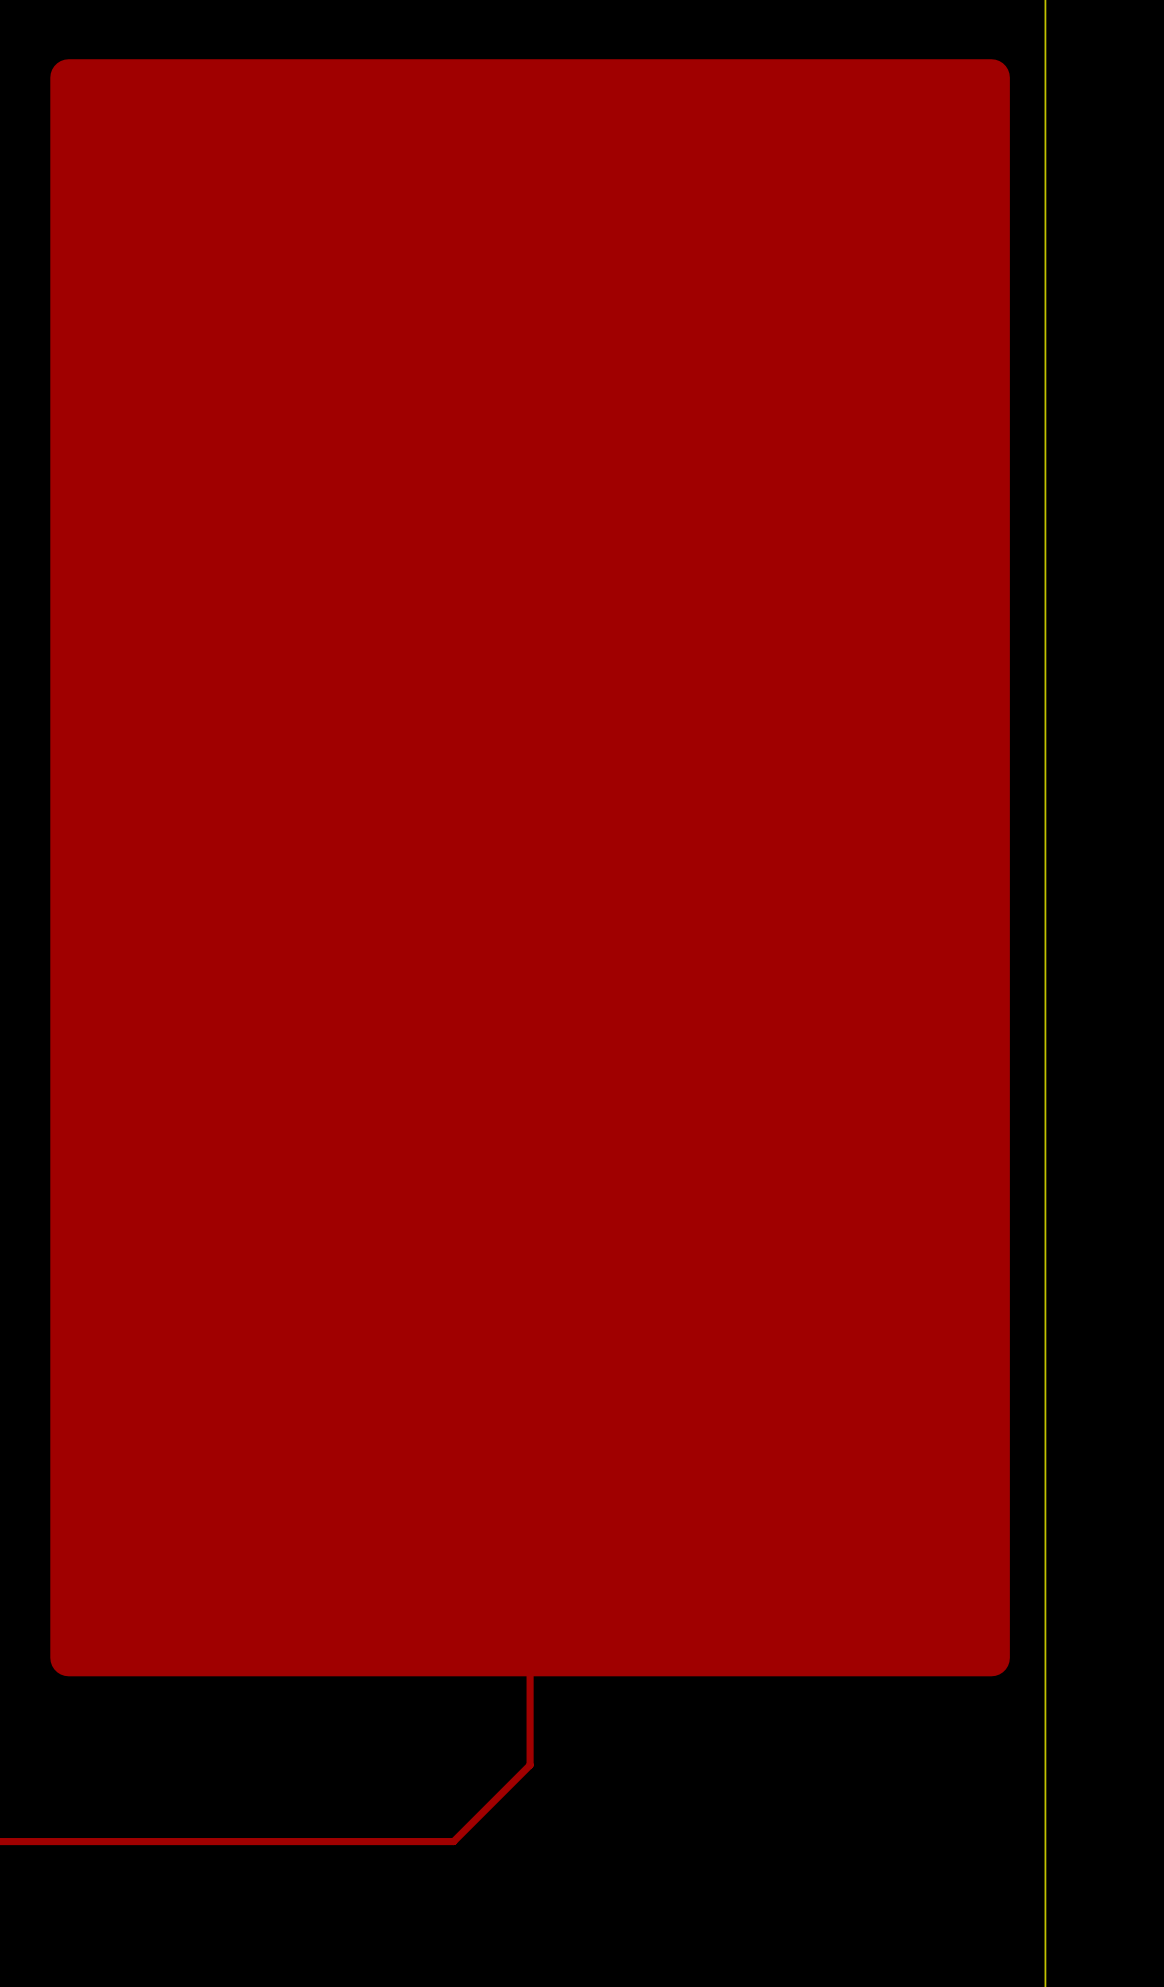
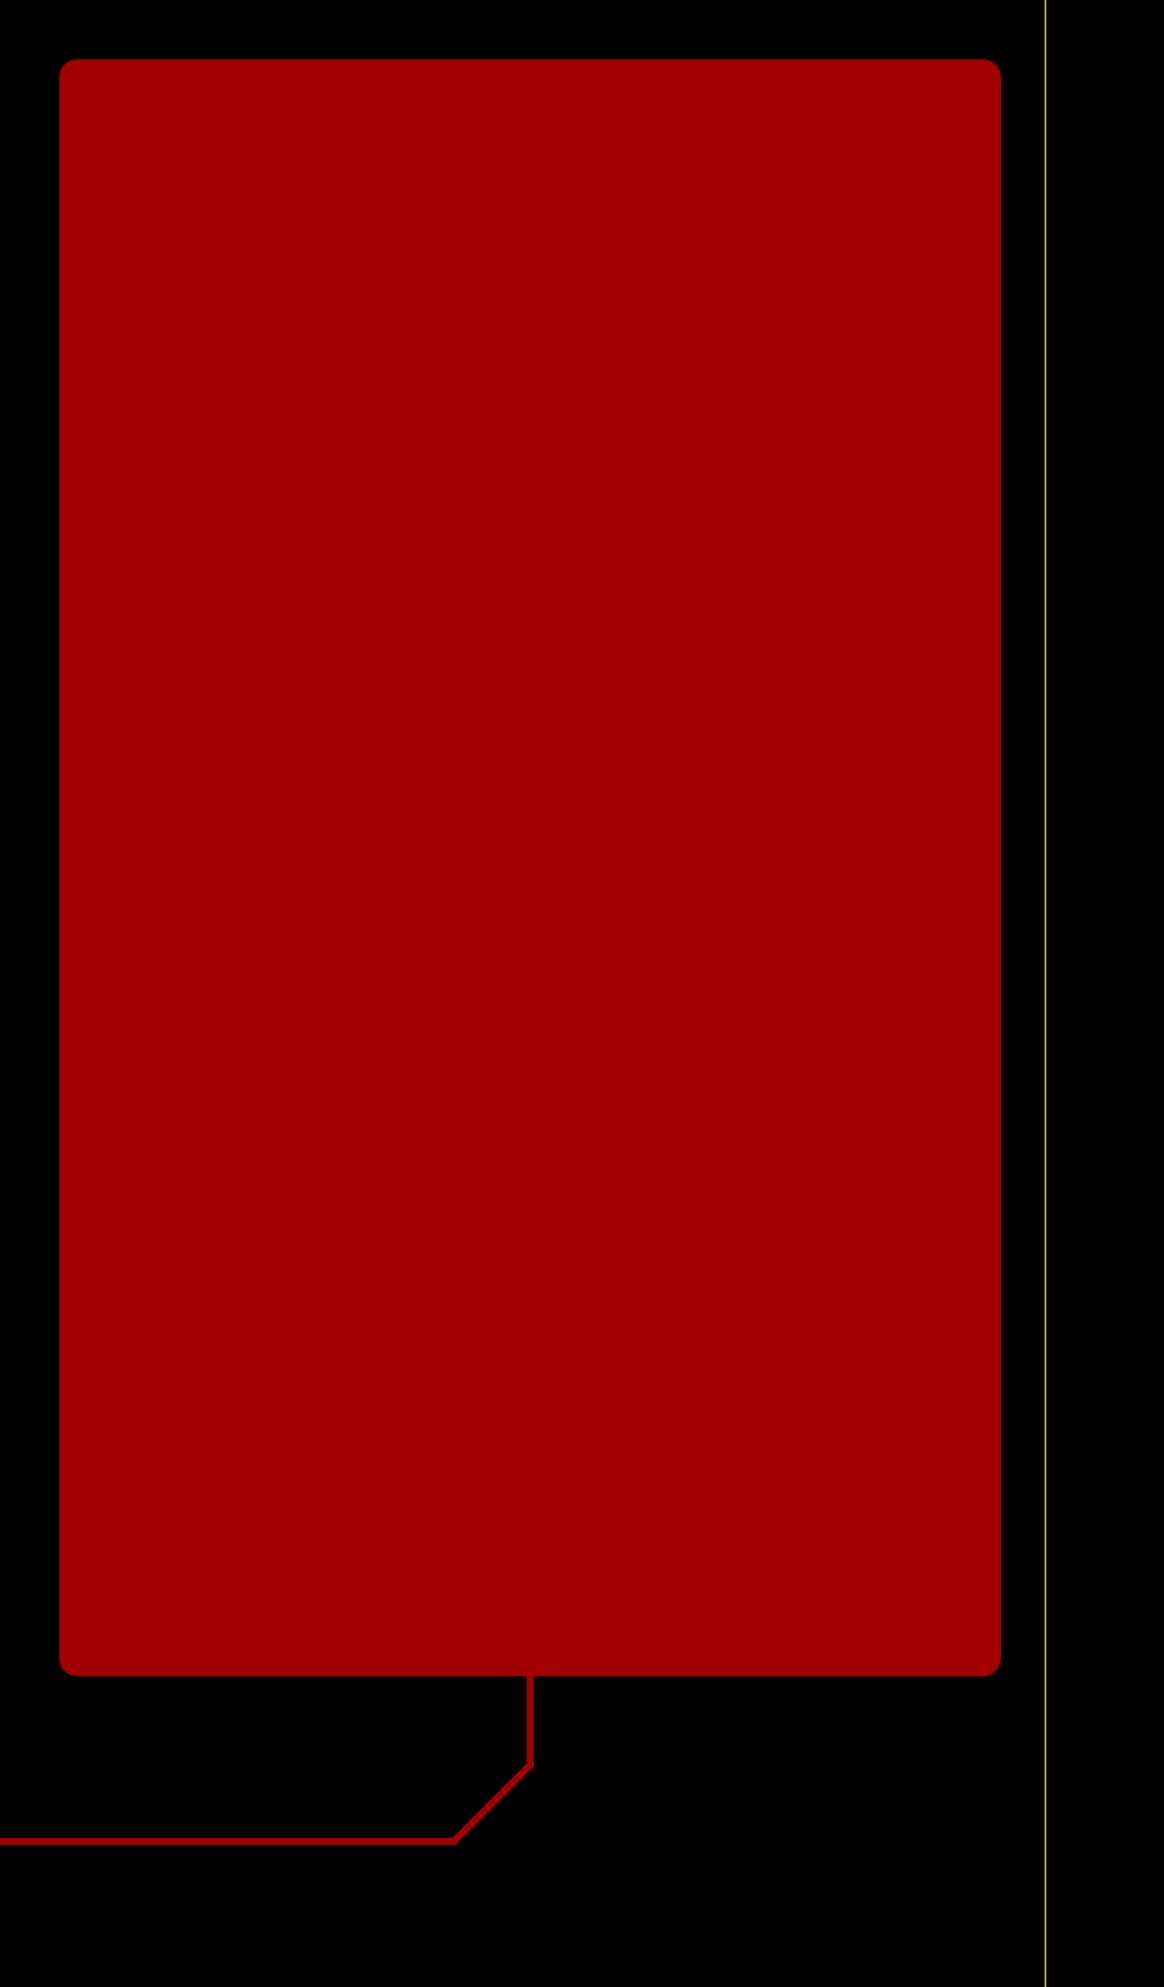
part footprint: [50, 59, 1010, 1677] -> [59, 59, 1002, 1677]

